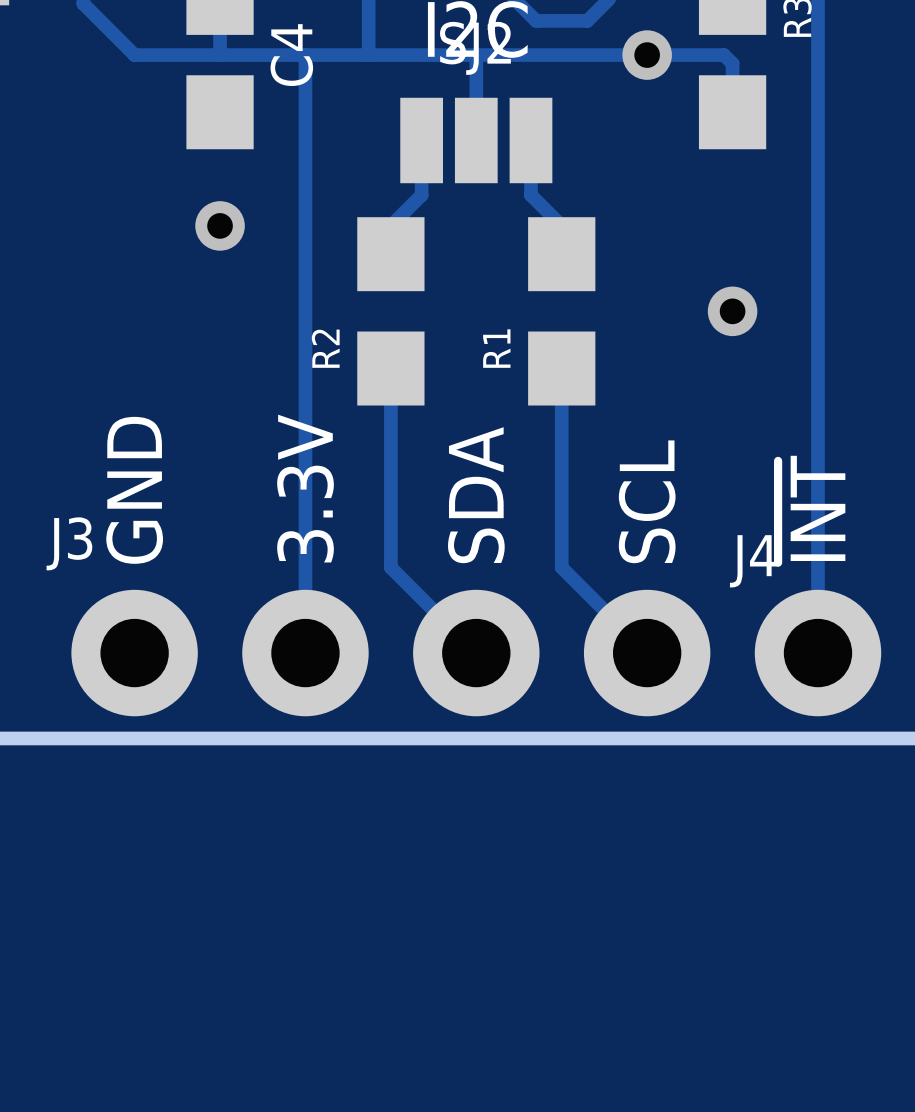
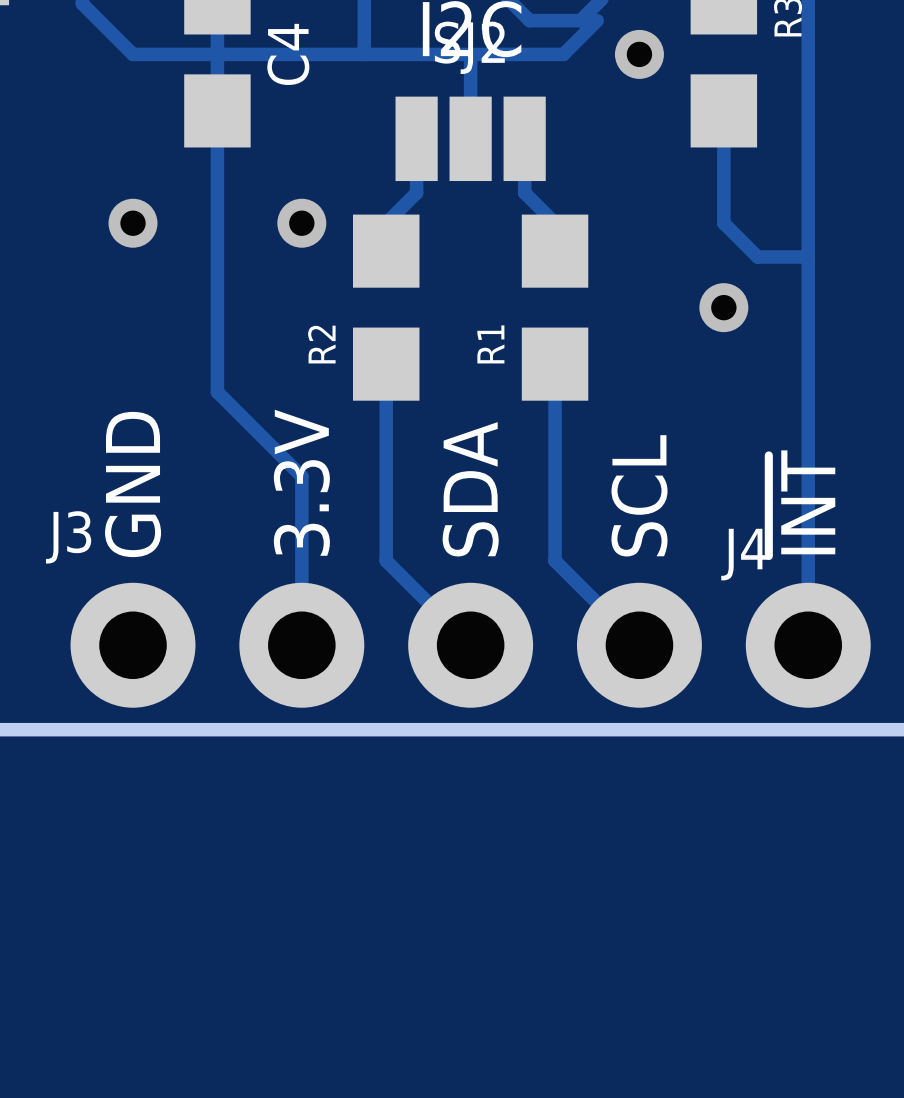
track: (305, 55) (305, 482) -> (217, 54) (217, 392) (301, 476)
track: (570, 55) (724, 55) (732, 63) (732, 112) -> (563, 54) (597, 20)
track: none -> (723, 110) (723, 223) (757, 256) (808, 256)
via: none -> (133, 223)
via: (220, 225) -> none
via: none -> (301, 223)

